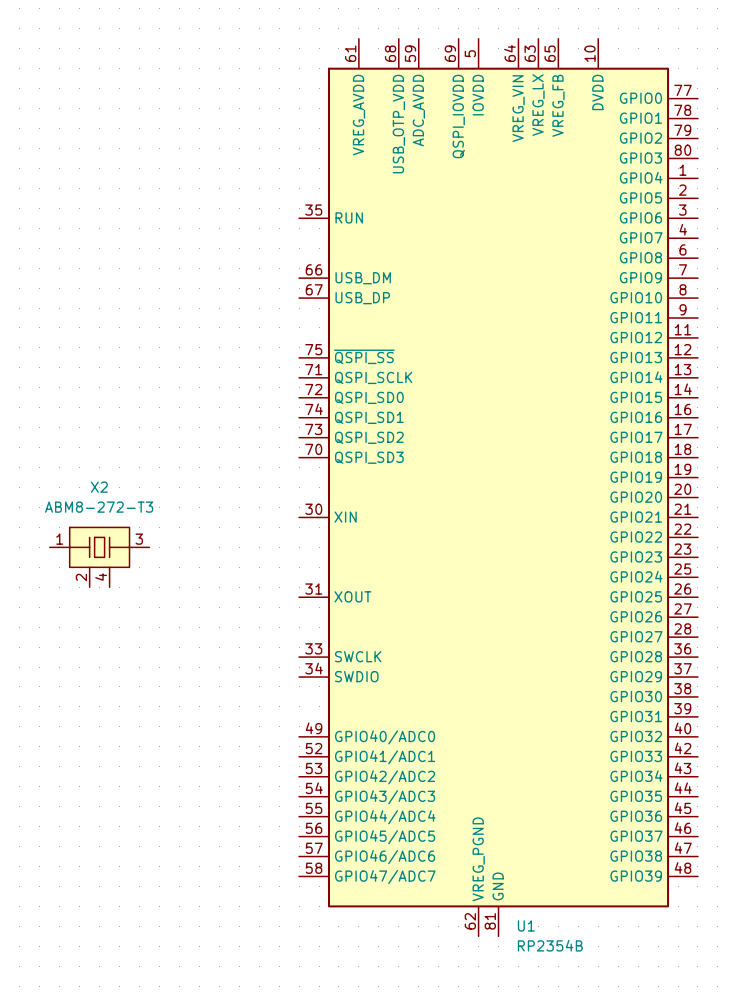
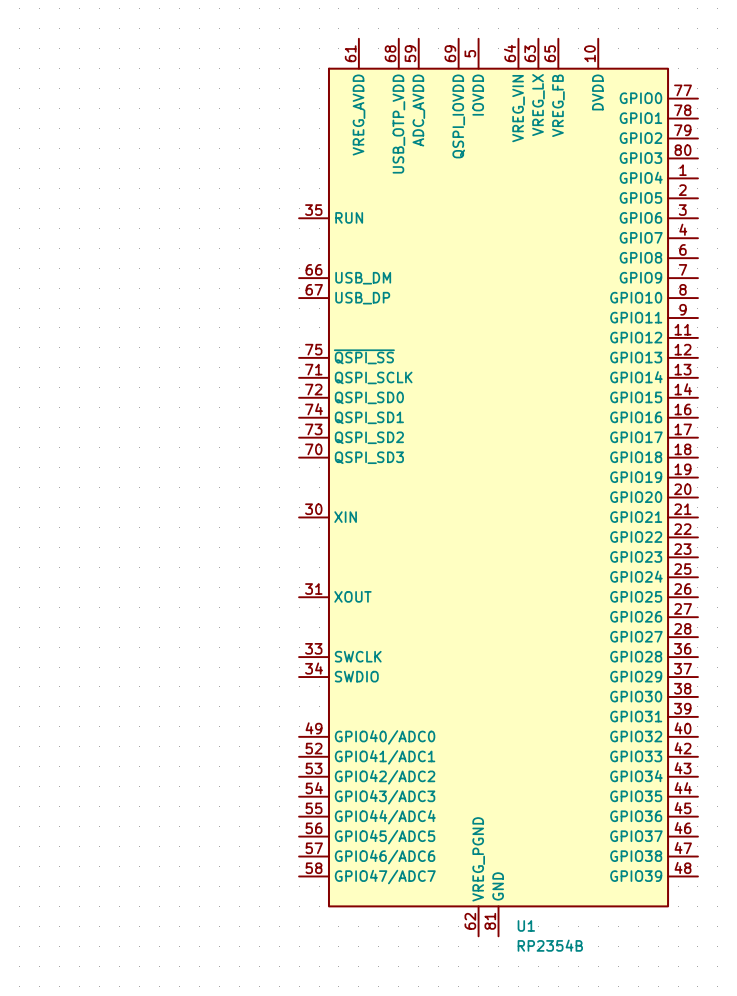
X2: ABM8-272-T3 (99, 557) -> none

